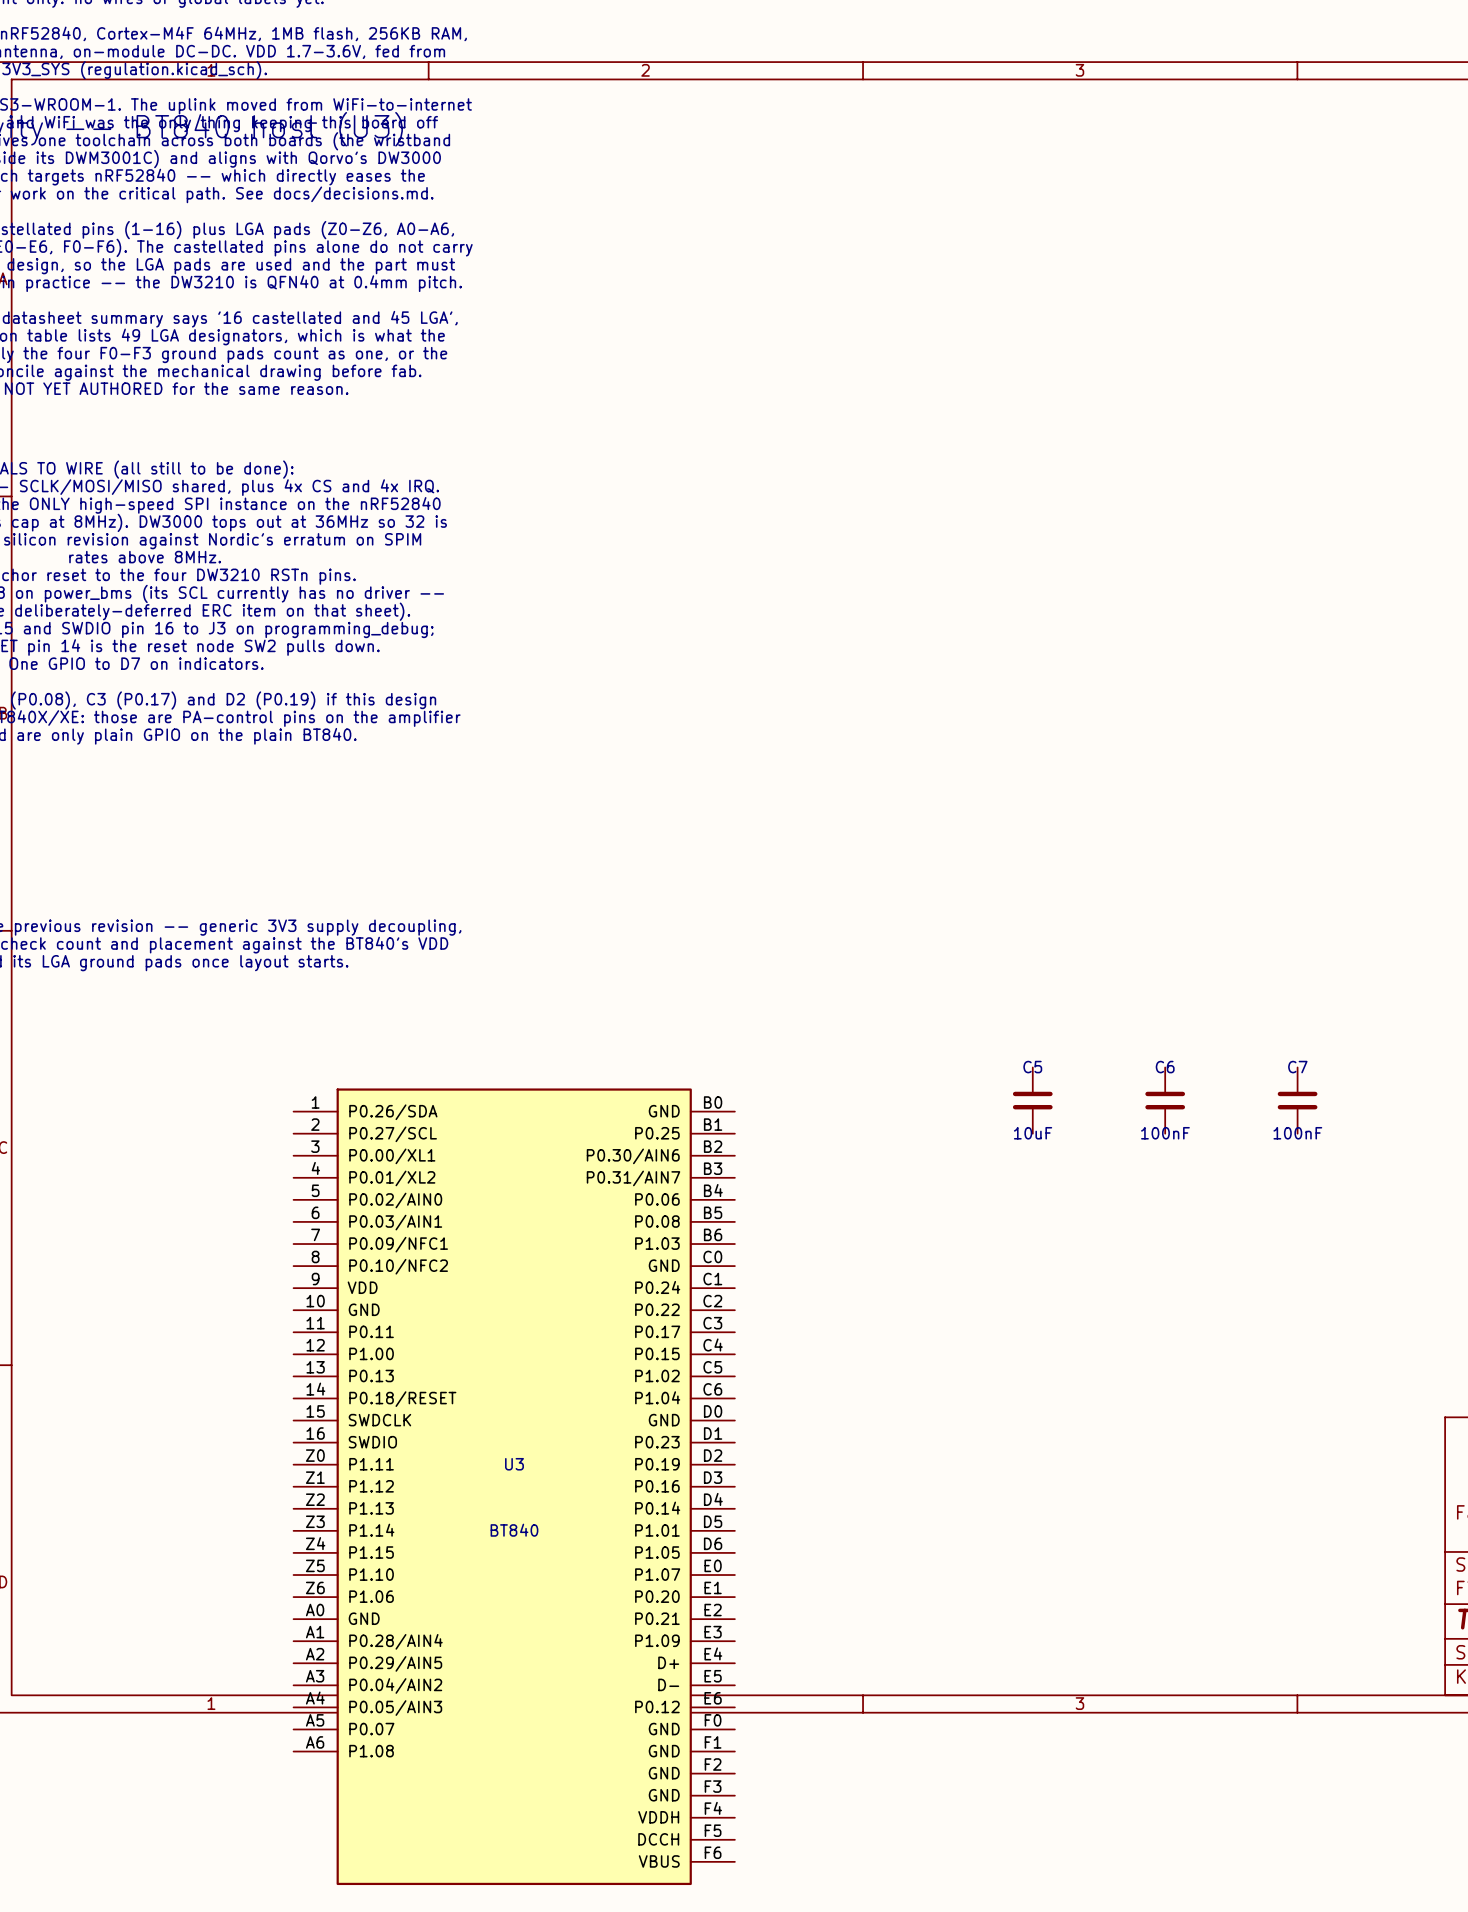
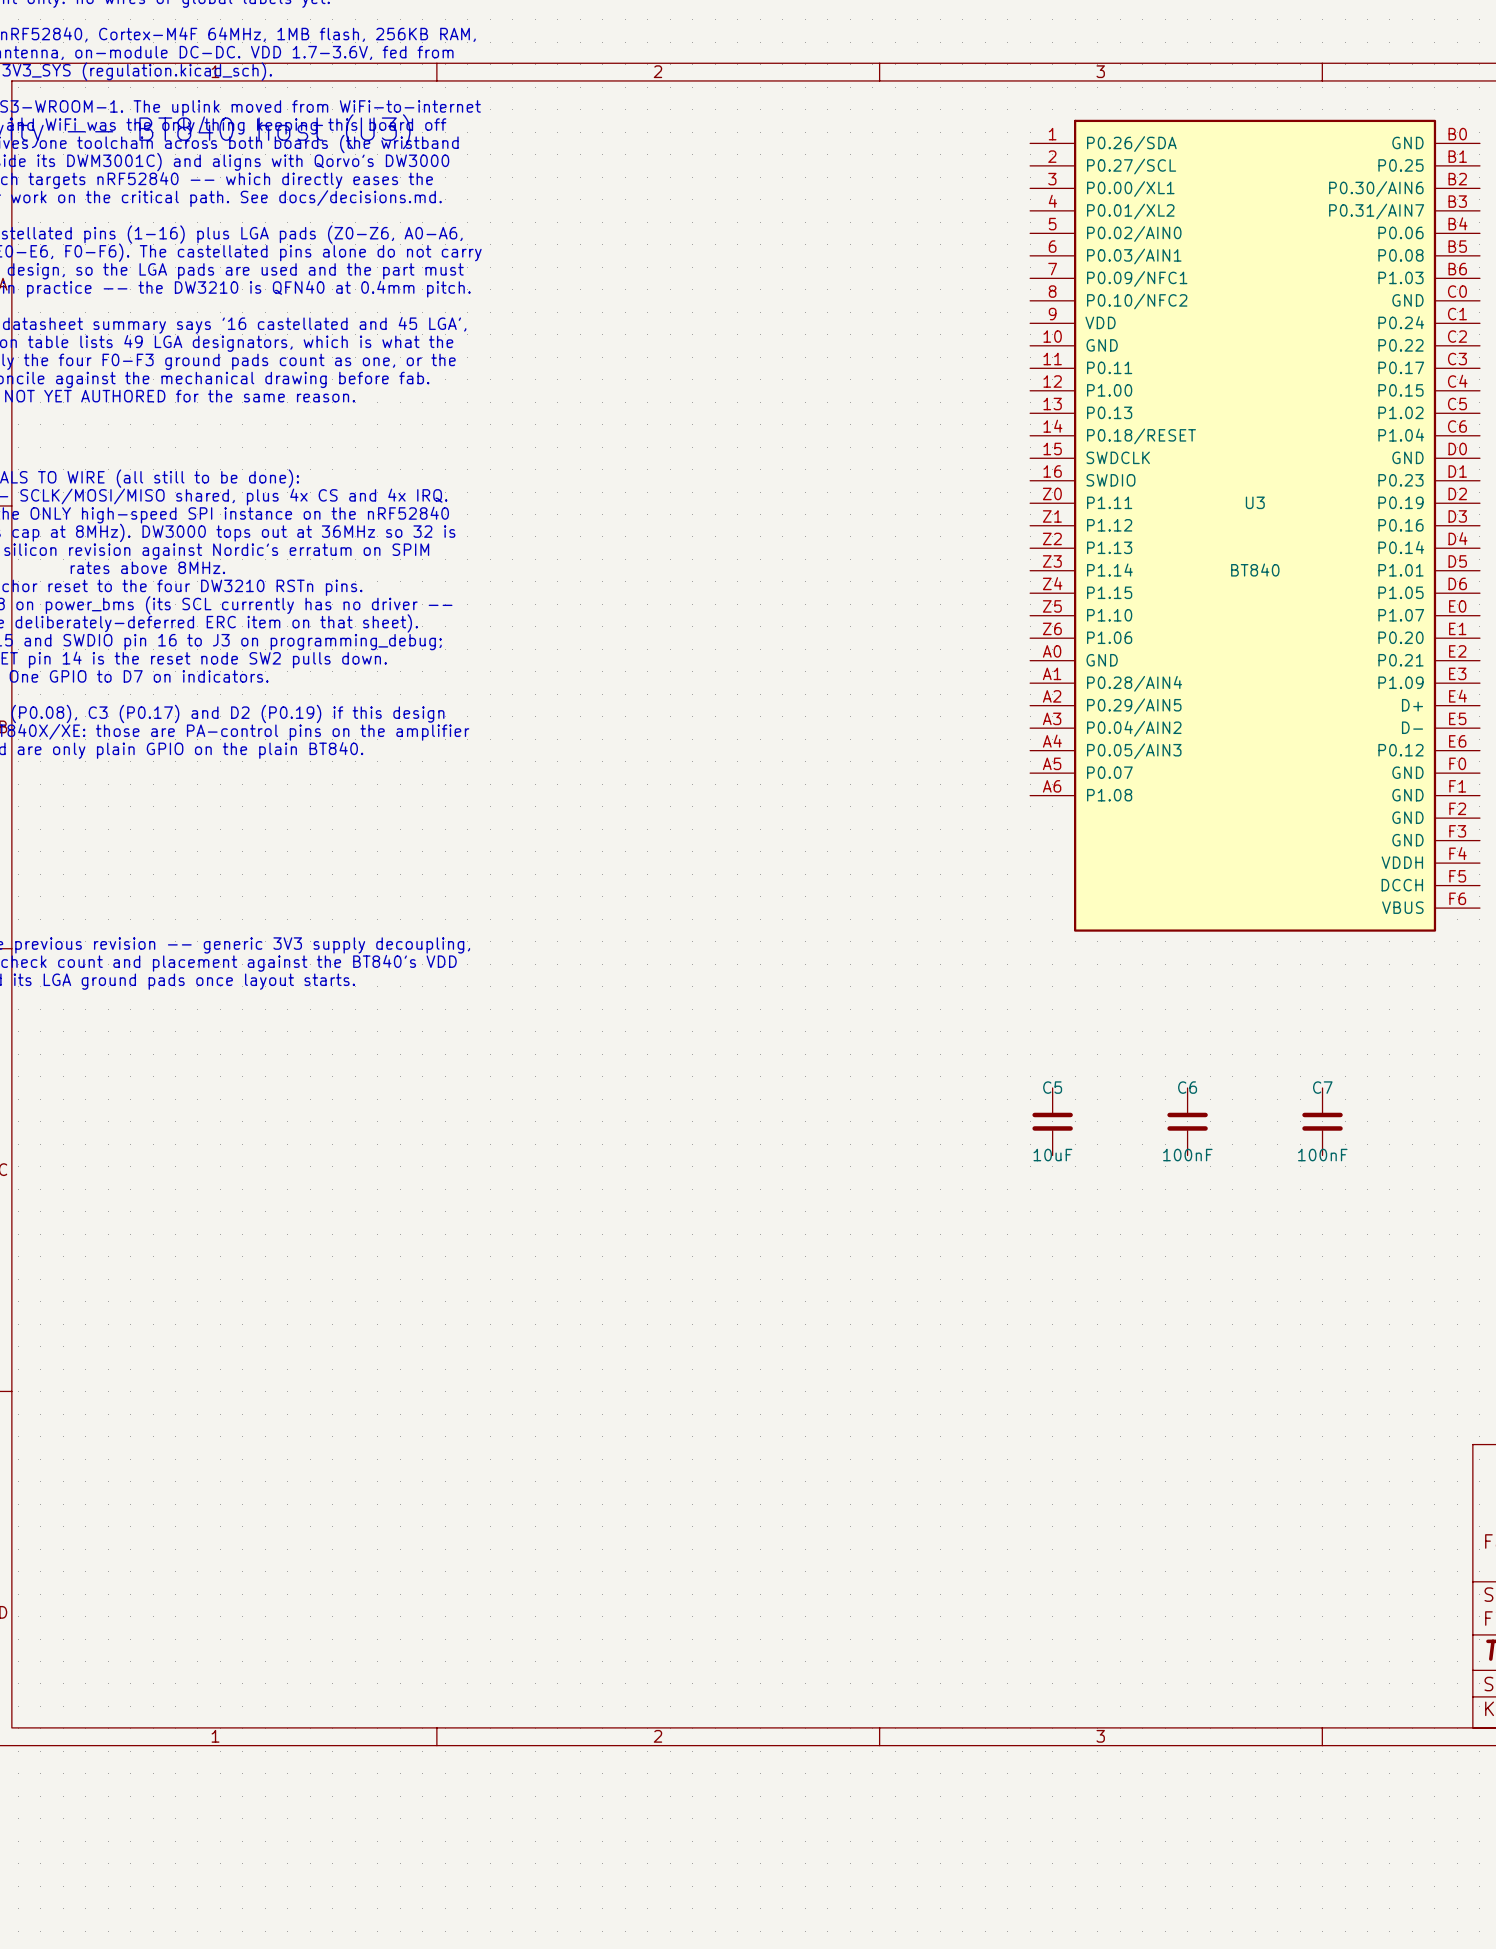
U3 position: (514, 1486) -> (1255, 525)

